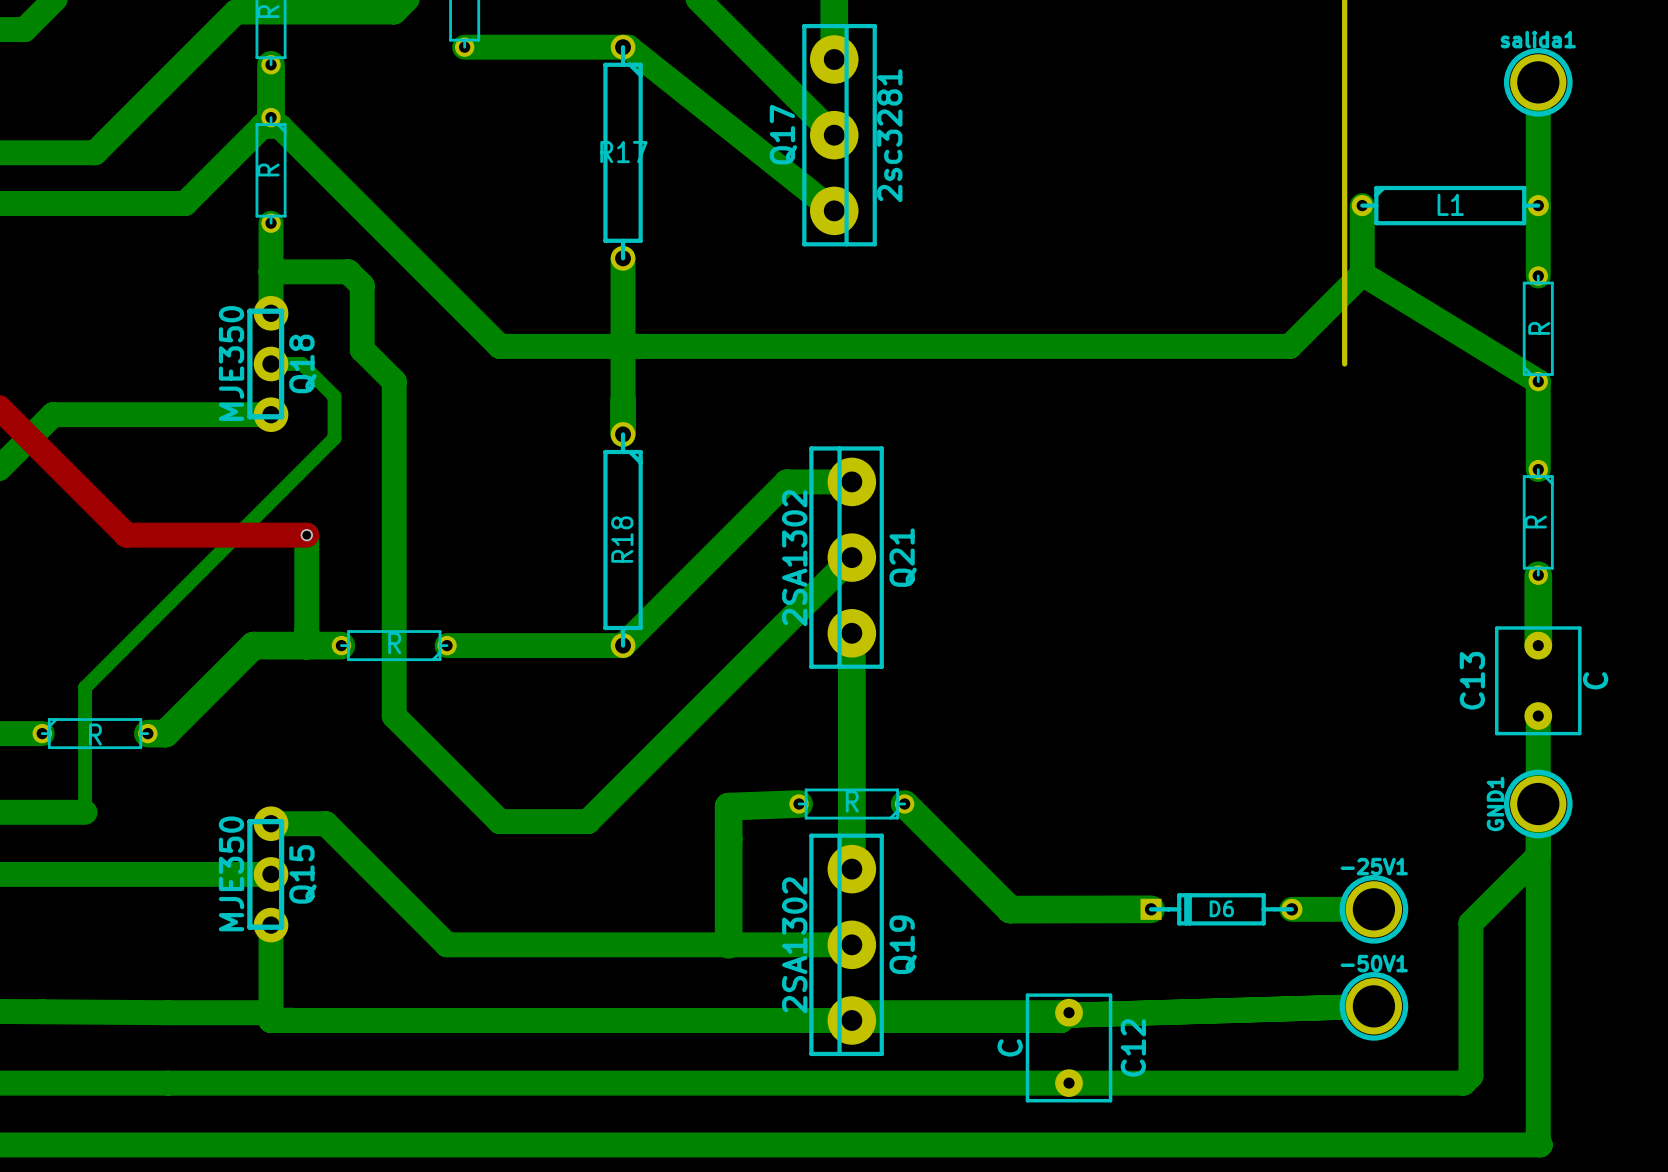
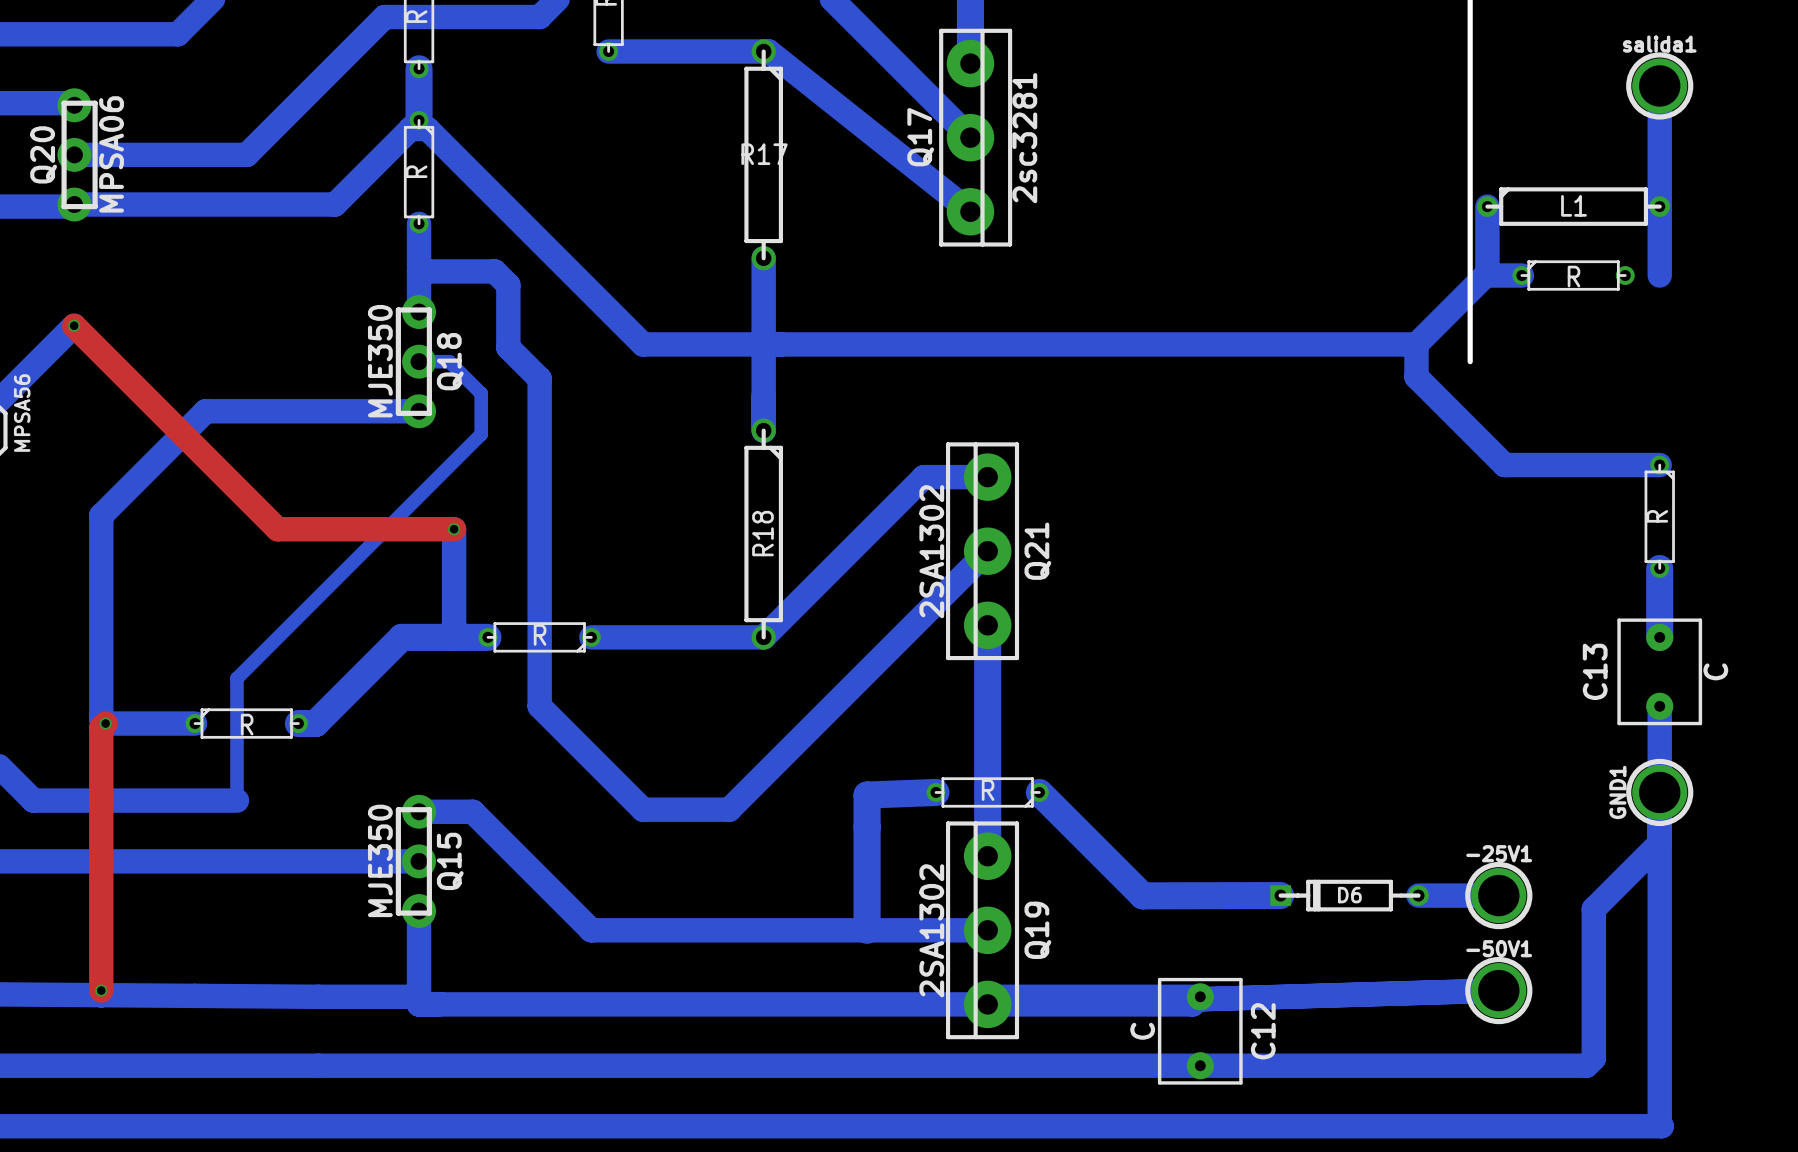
bottom track: (1362, 273) (1538, 381) (1538, 469) -> (1416, 344) (1416, 376) (1504, 465) (1659, 465)
bottom track: none -> (1485, 275) (1521, 275)
part rotation: 0° (1538, 328) -> 90° clockwise (1573, 275)
part position: (1538, 328) -> (1573, 275)

